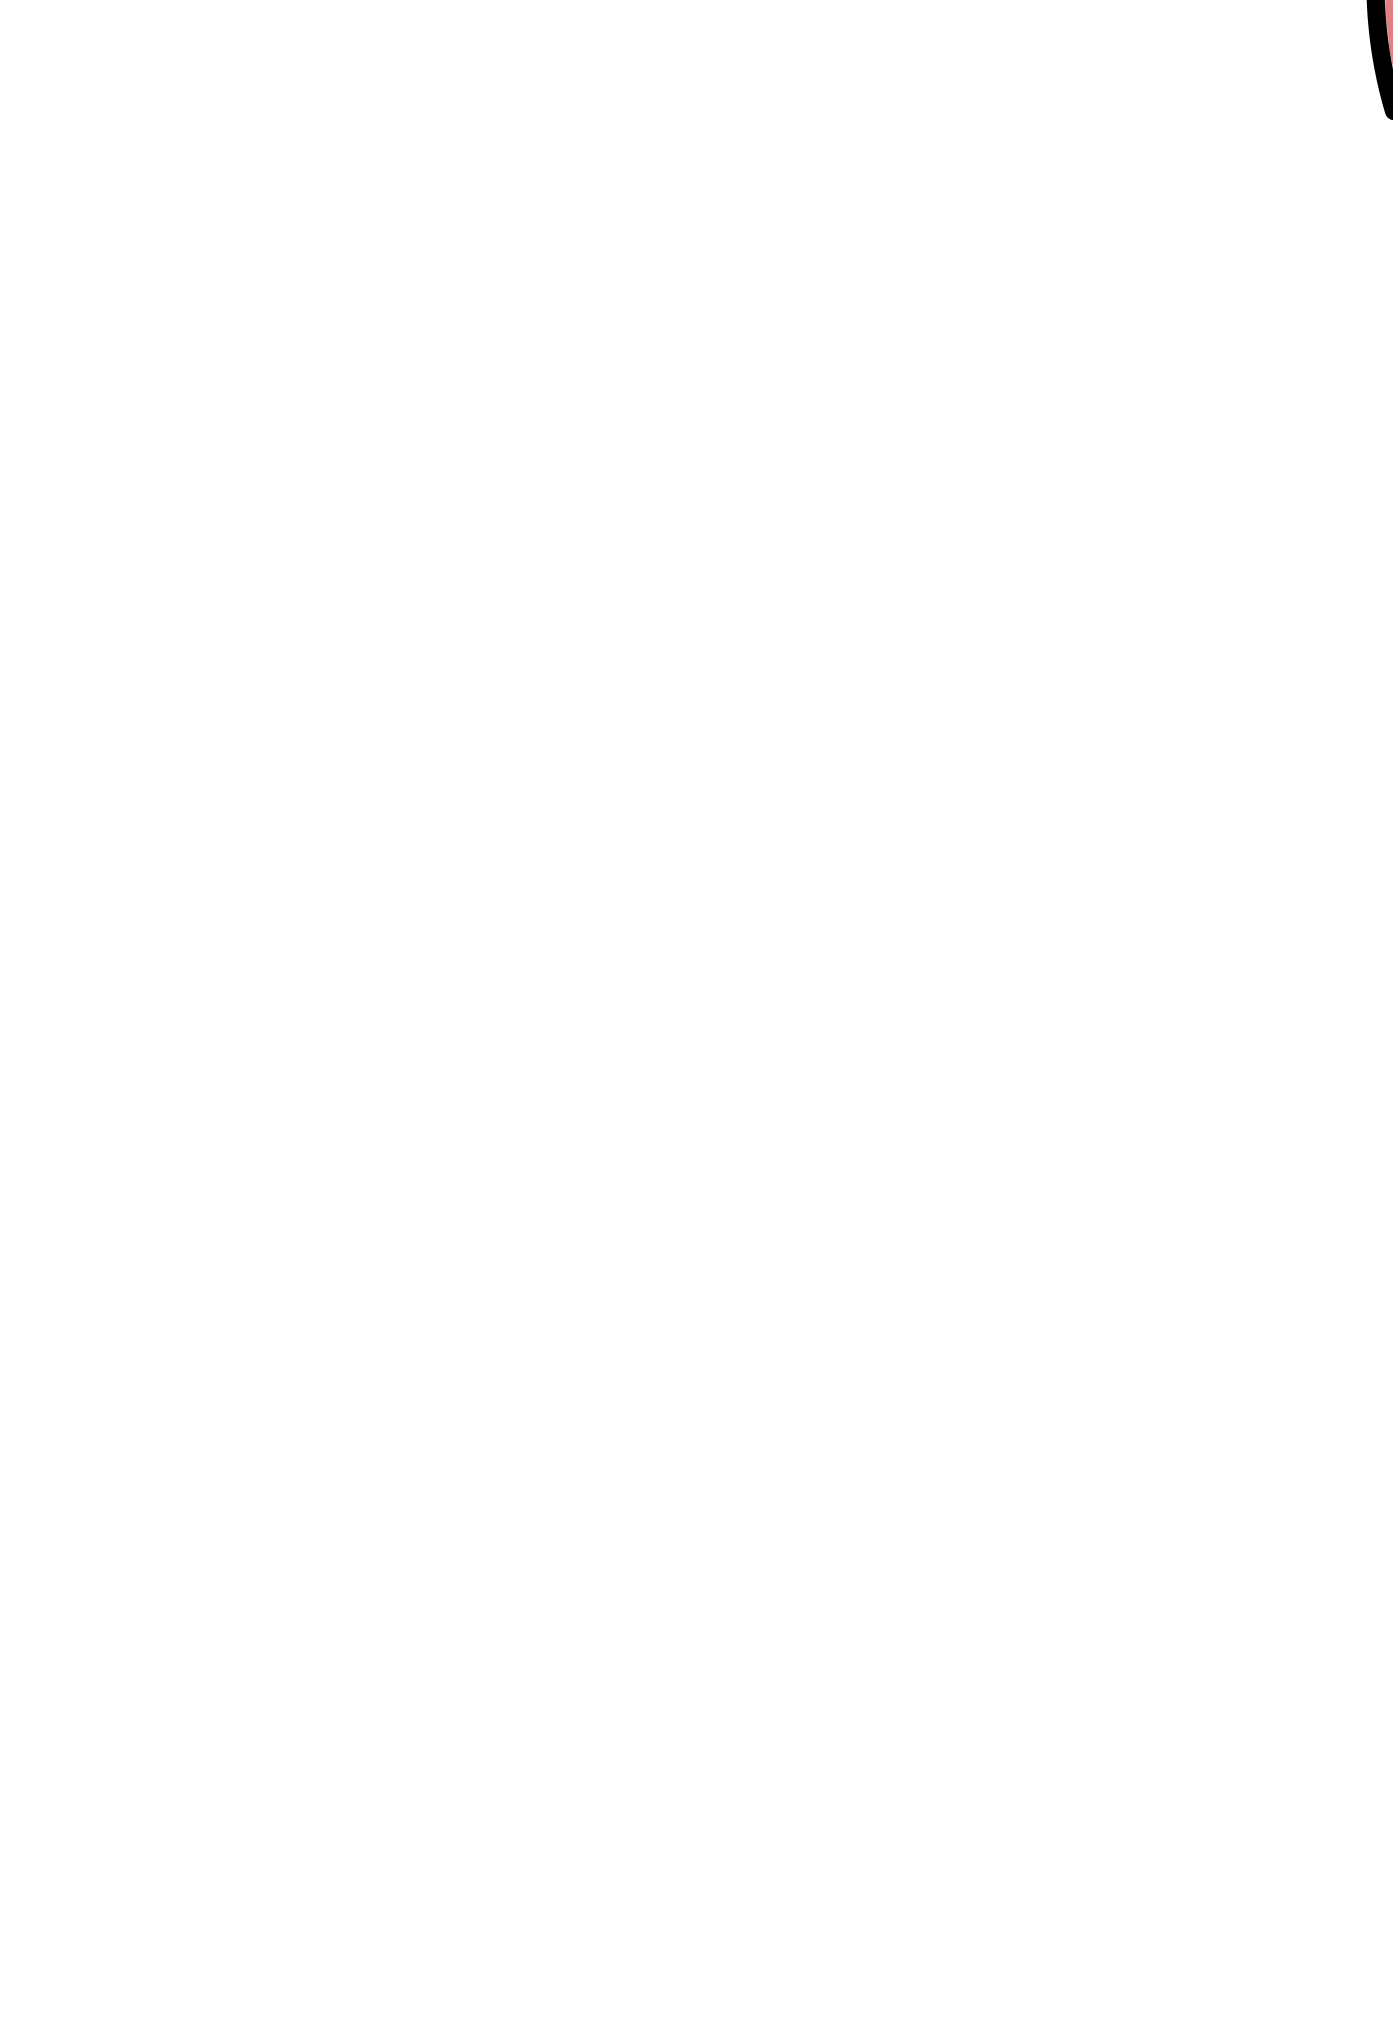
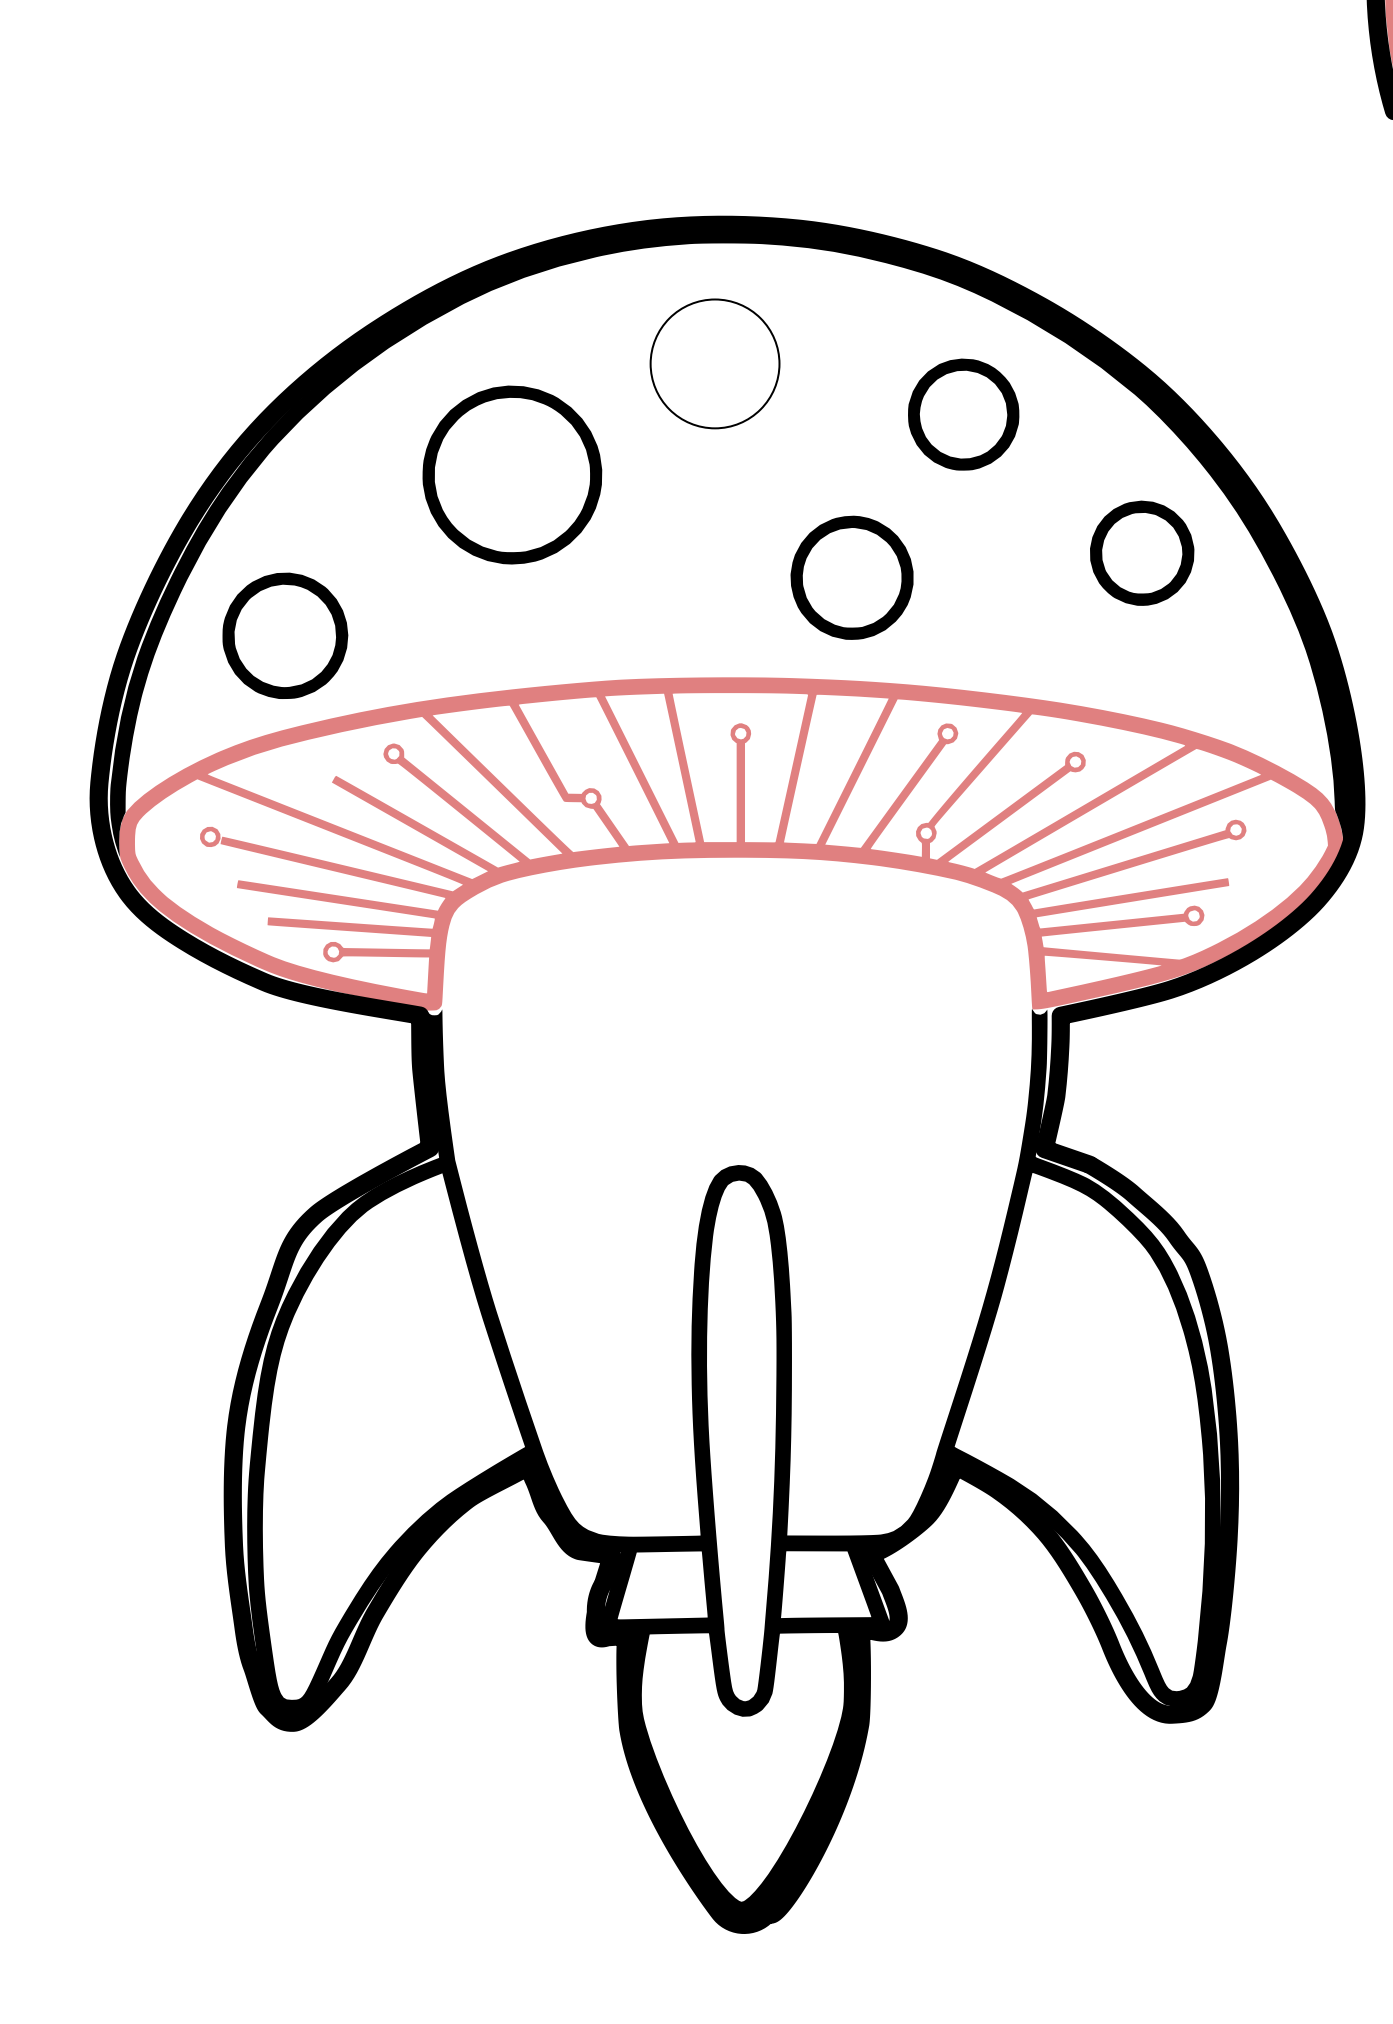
part: none -> (727, 1074)

